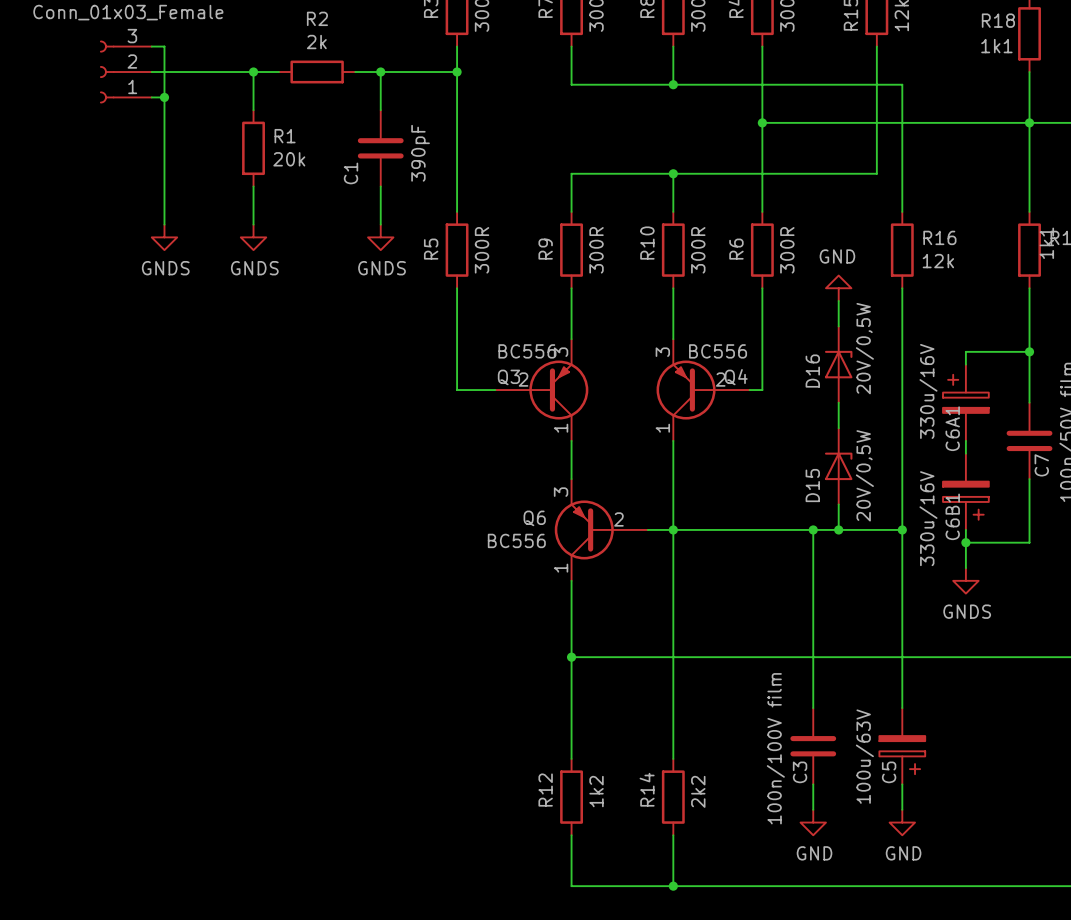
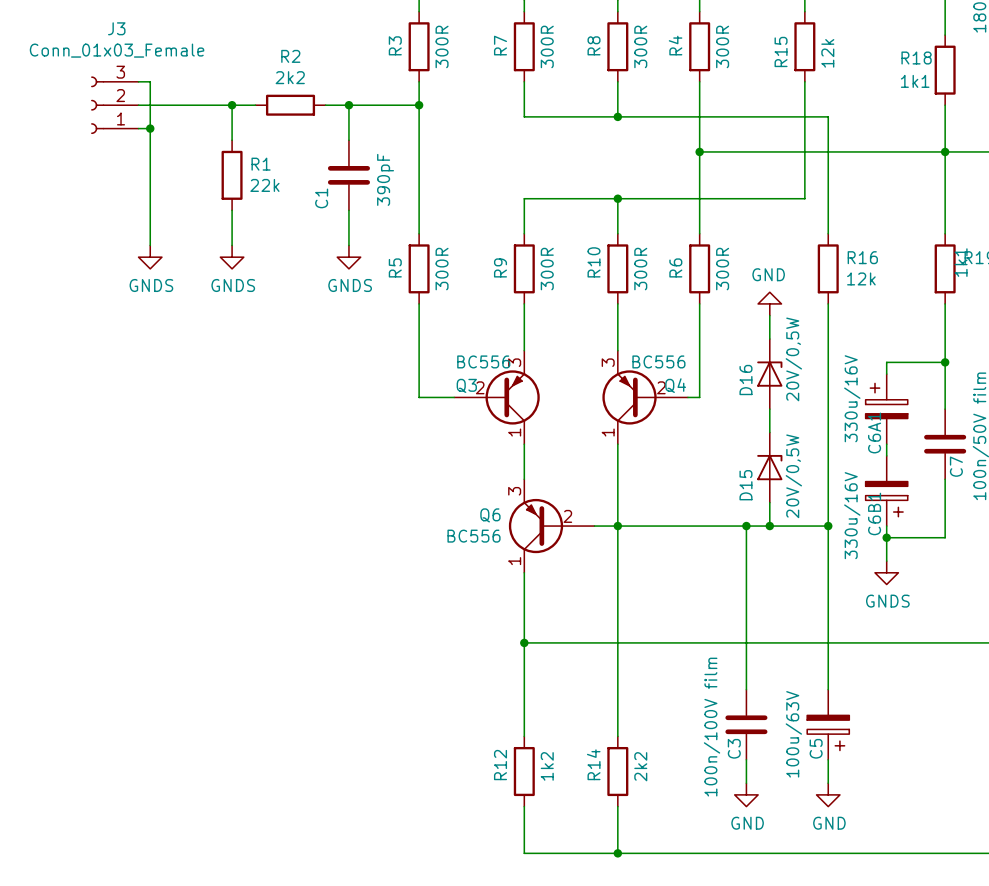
R2 value: 2k (316, 42) -> 2k2 (290, 77)
R1 value: 20k (289, 159) -> 22k (264, 185)

